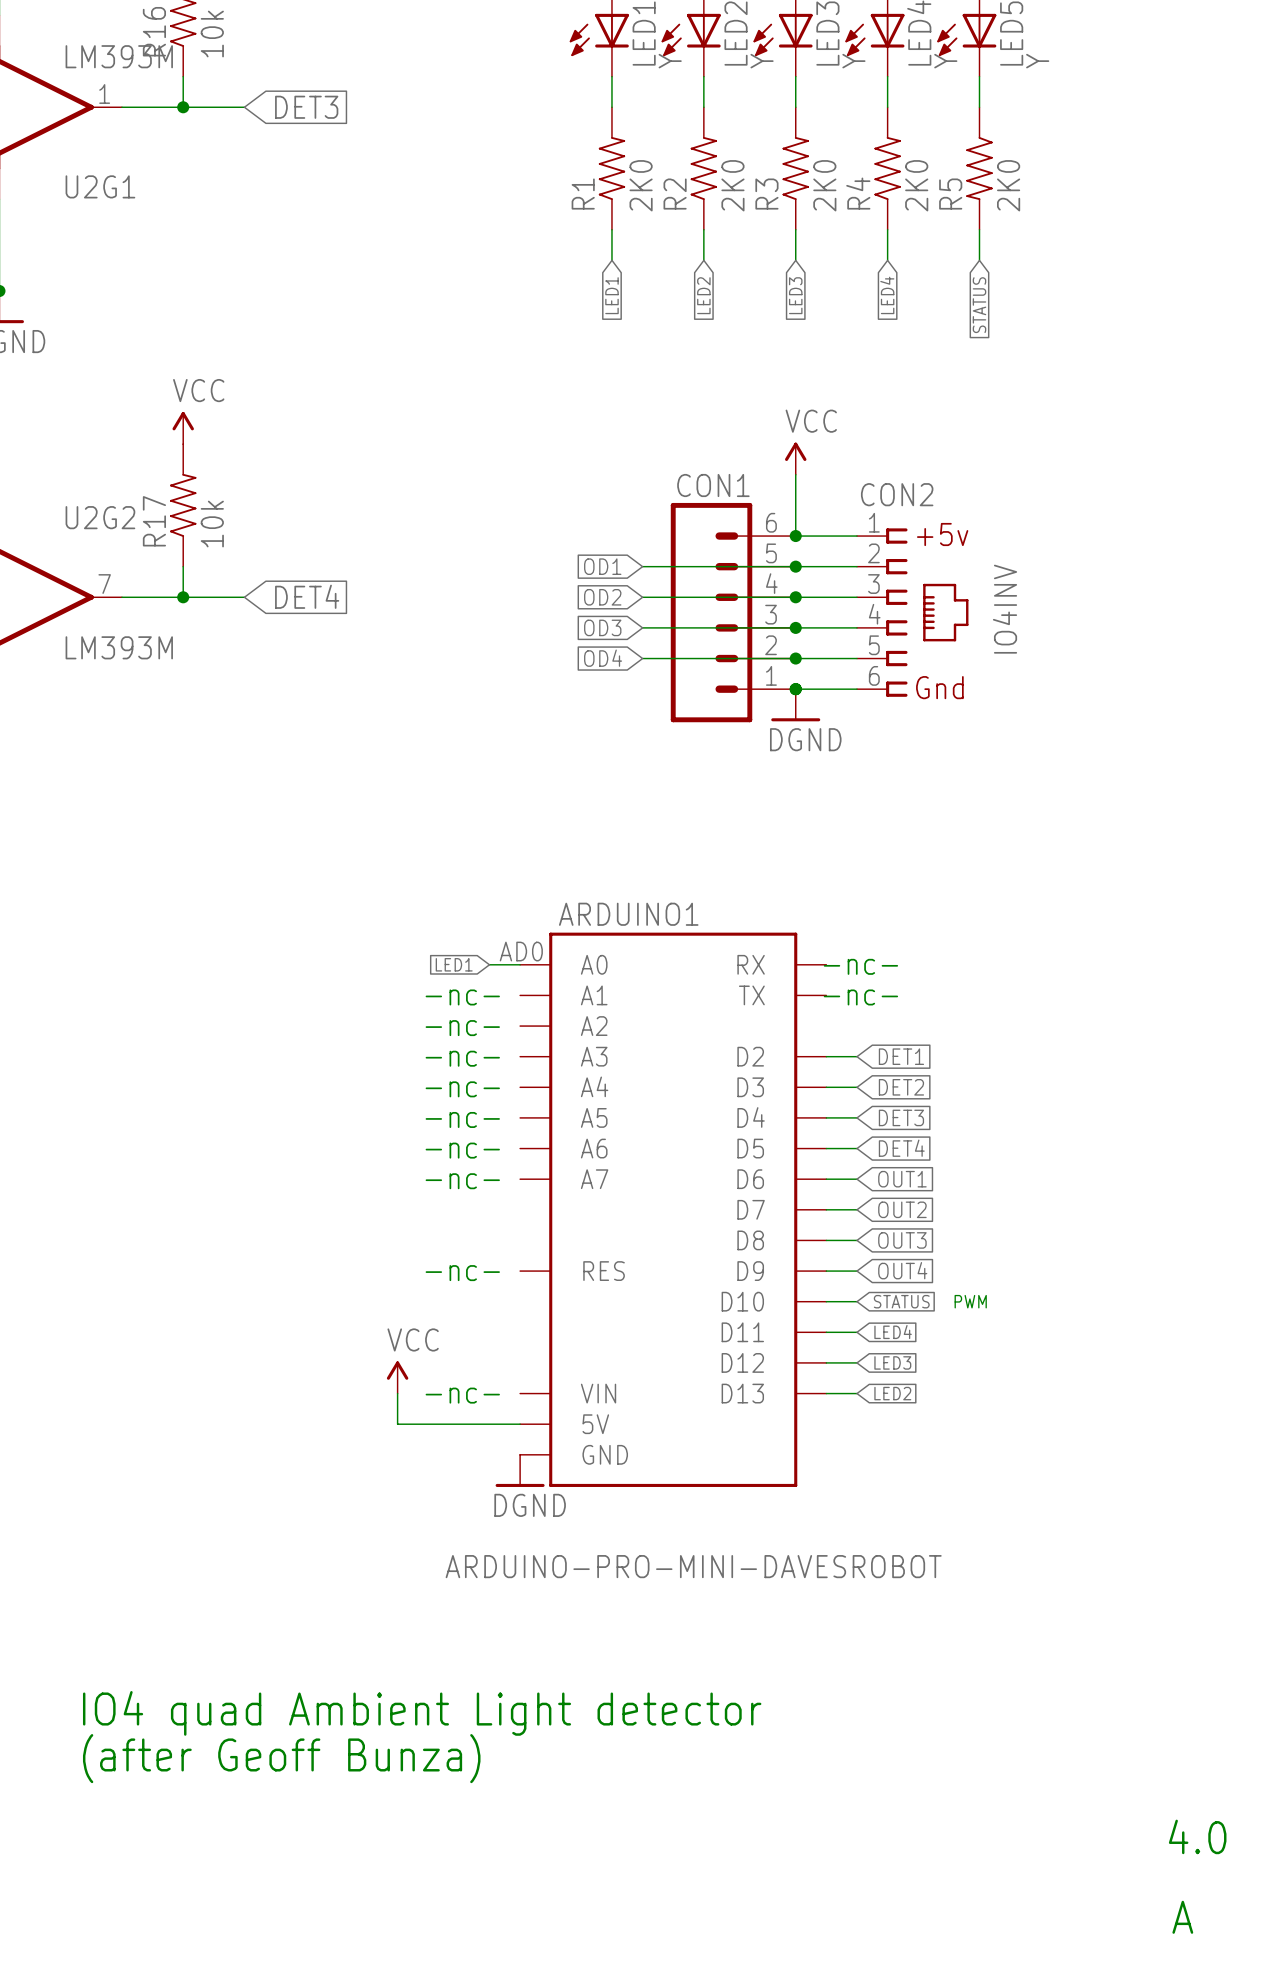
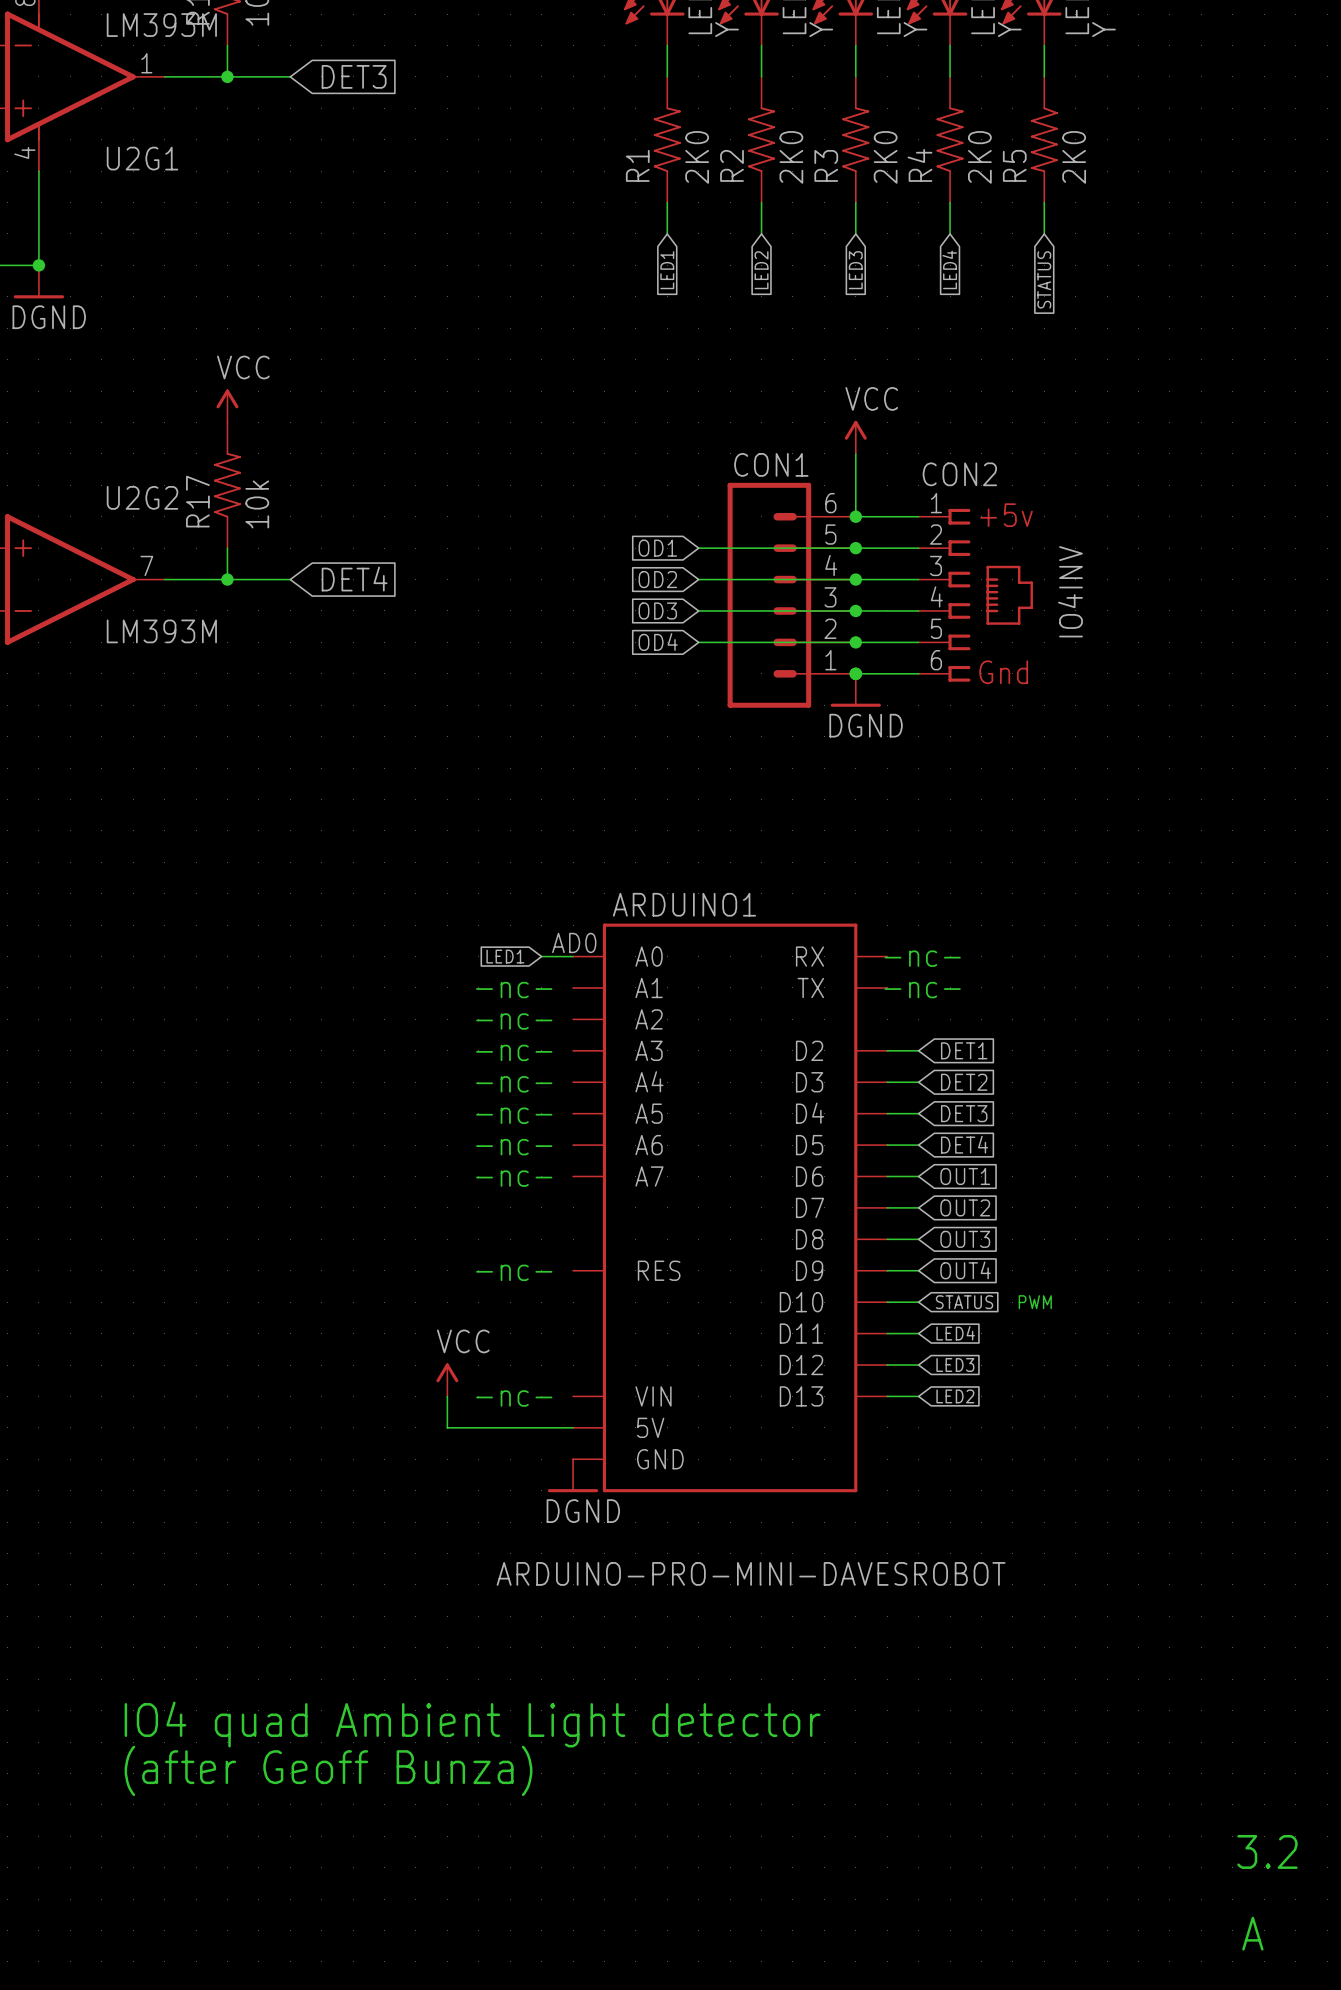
text: 4.0 (1197, 1836) -> 3.2 (1267, 1851)

